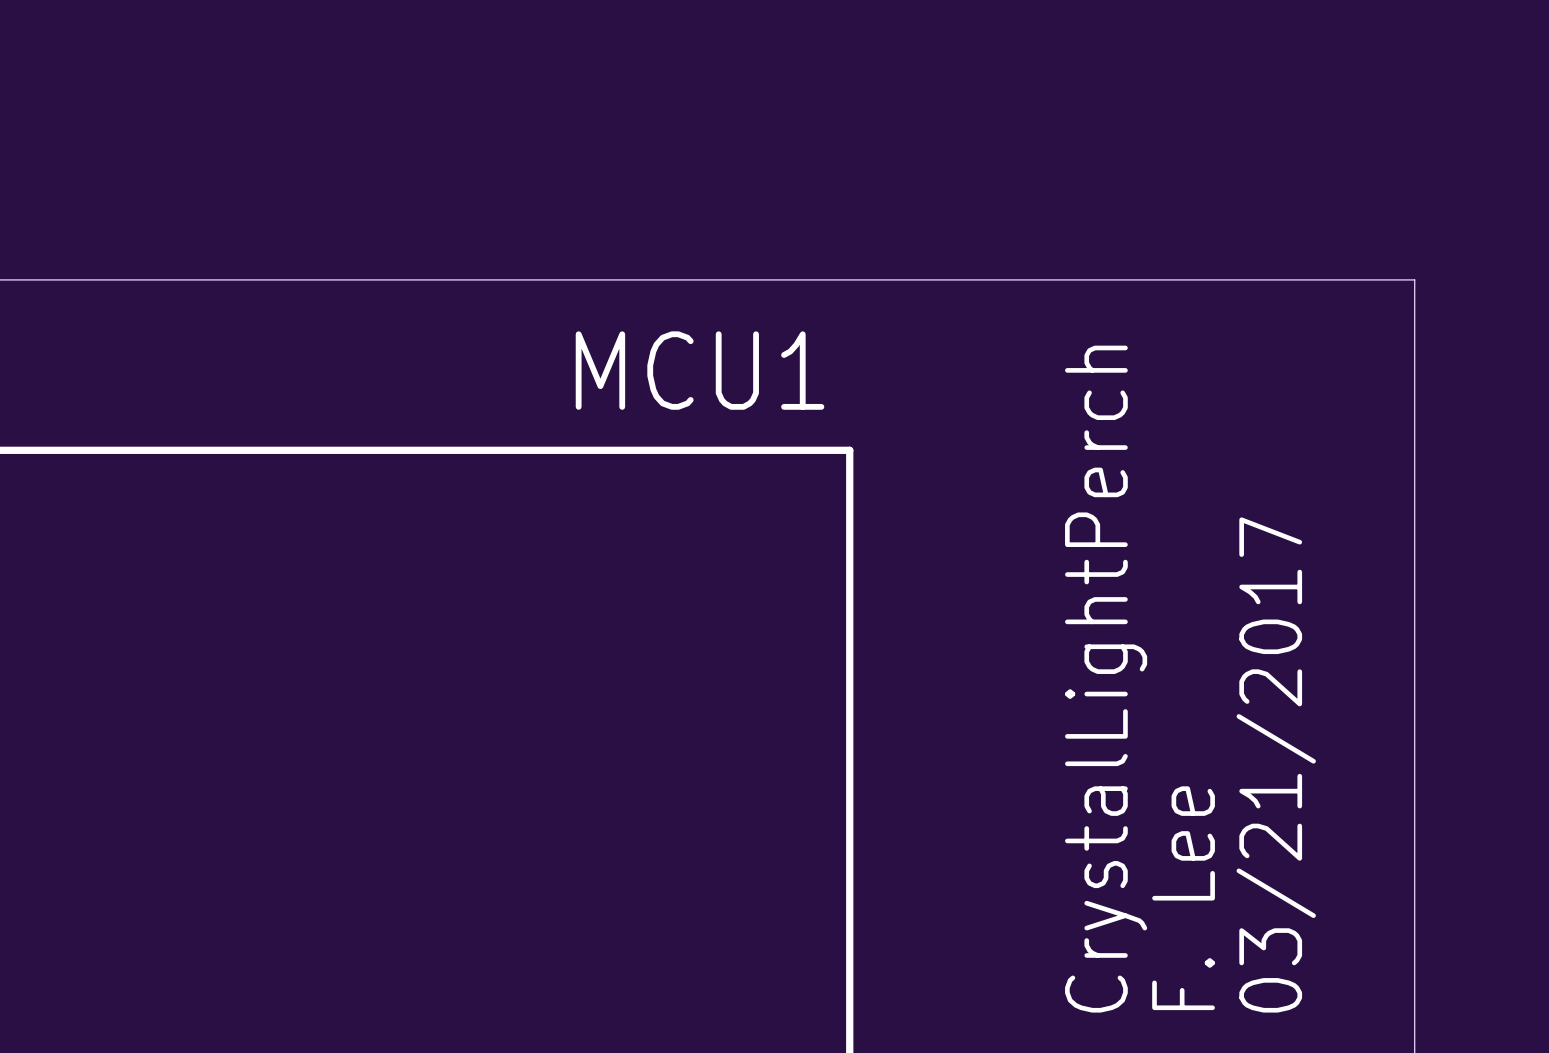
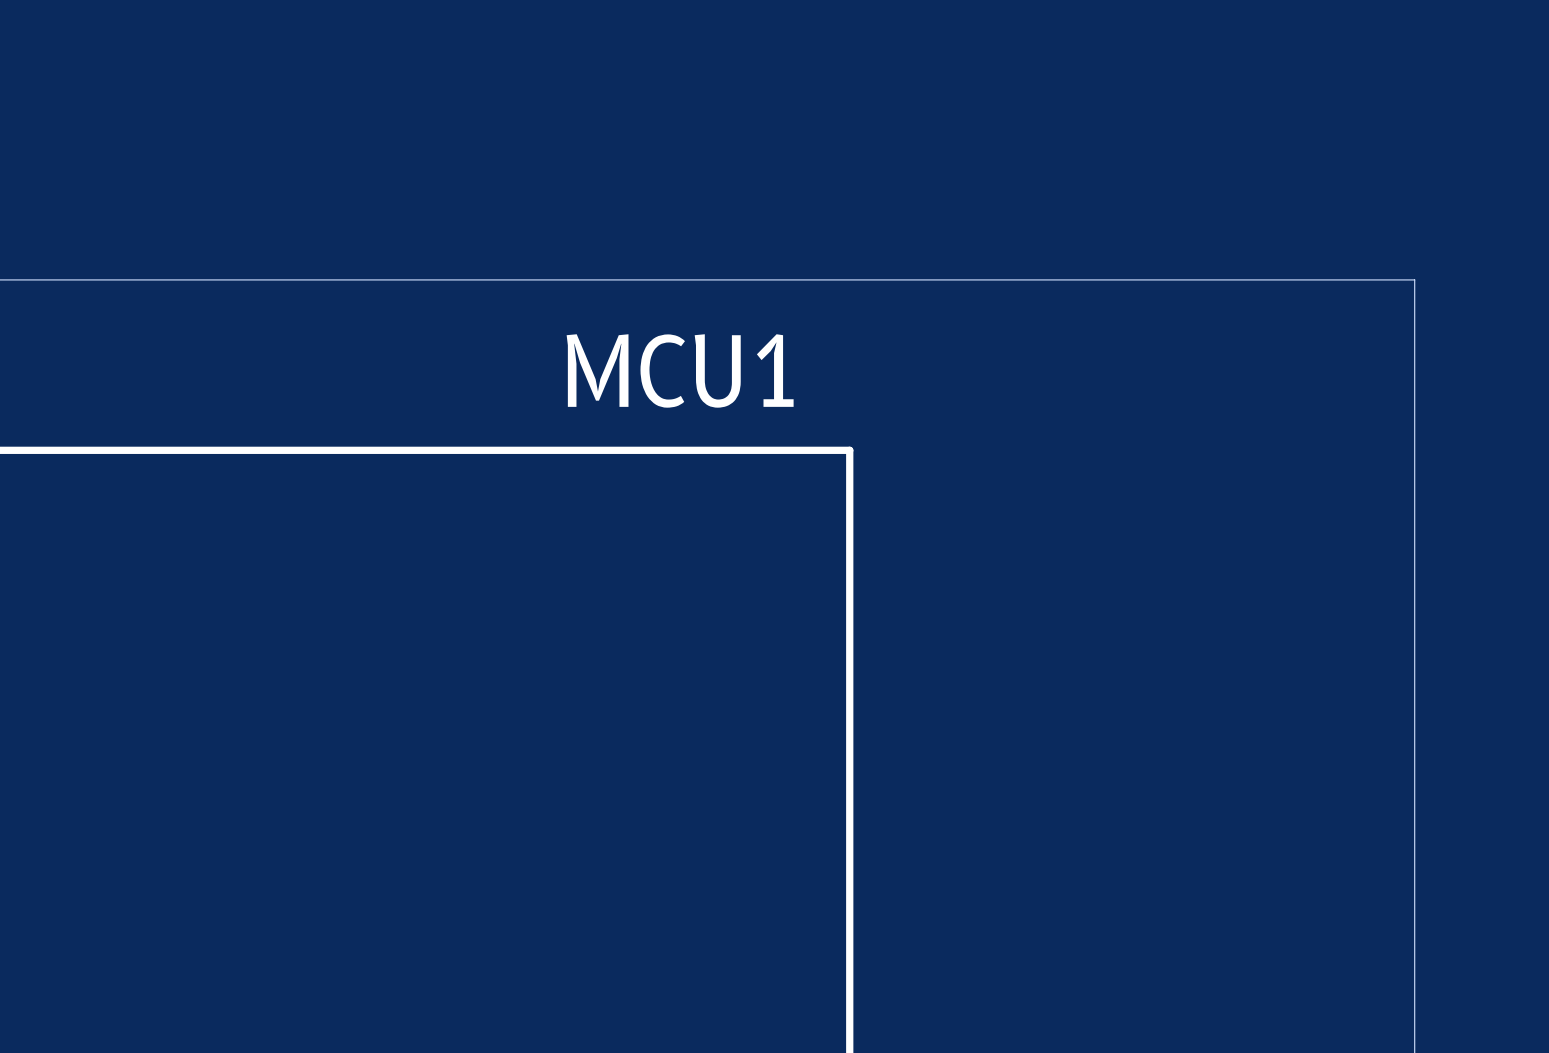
text: CrystalLightPerch (1106, 679) -> none
text: 03/21/2017 (1276, 765) -> none
text: F. Lee (1183, 898) -> none

